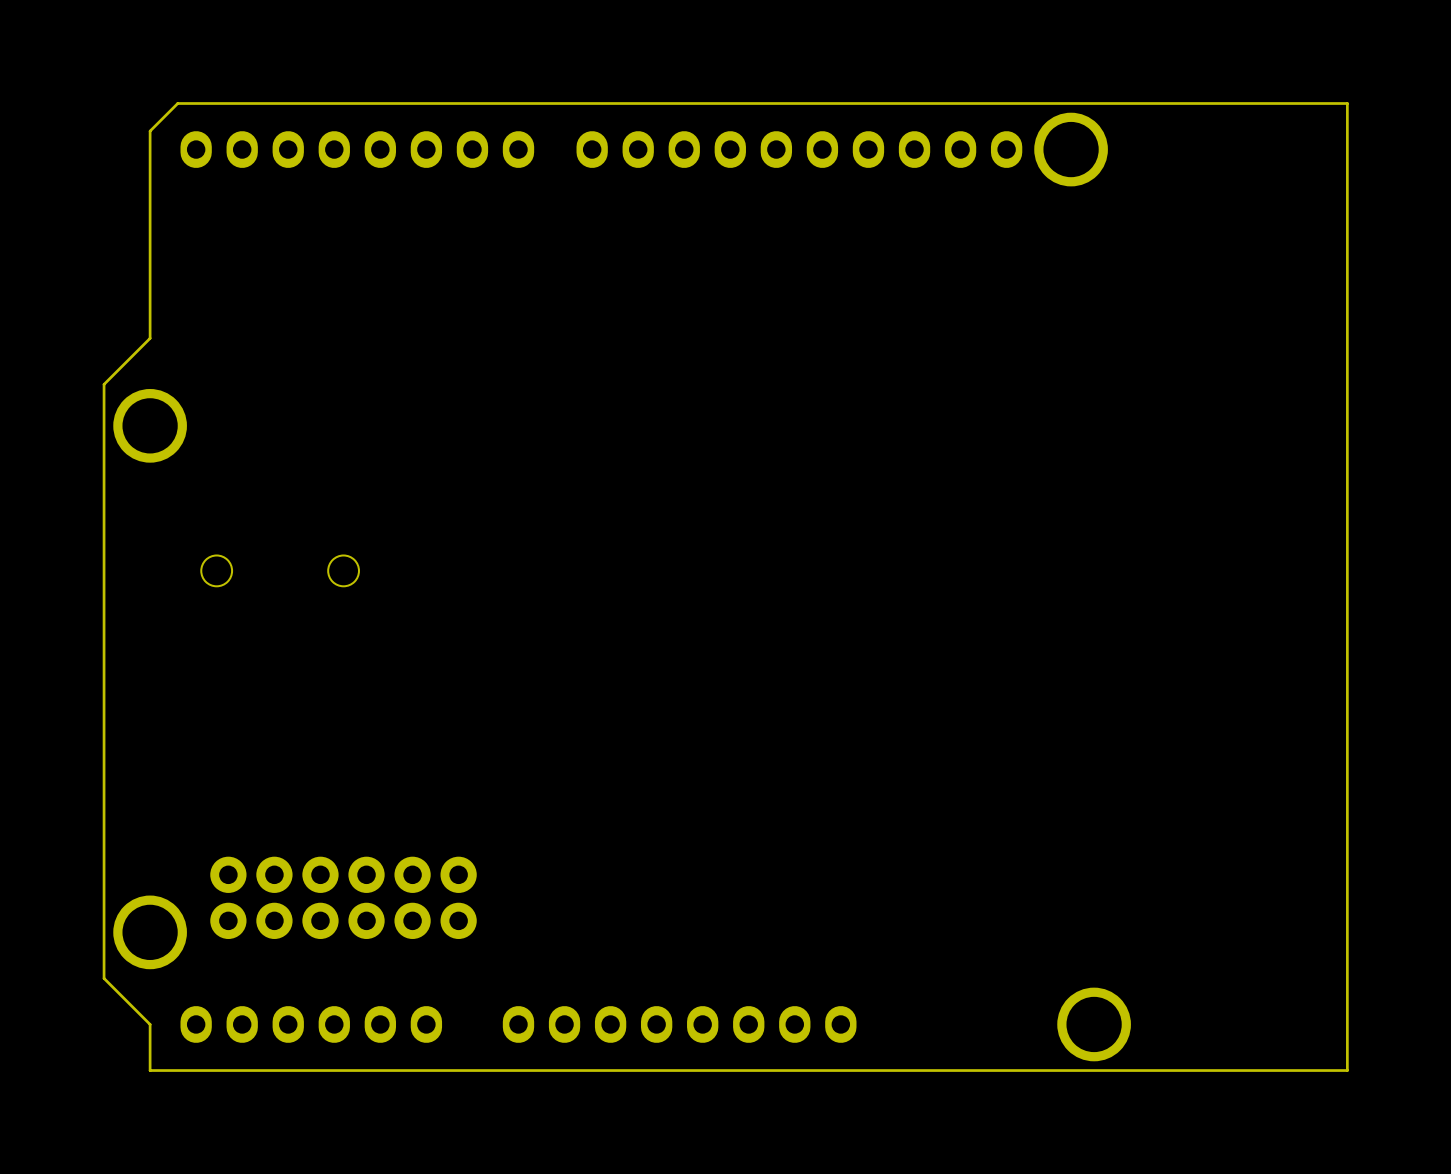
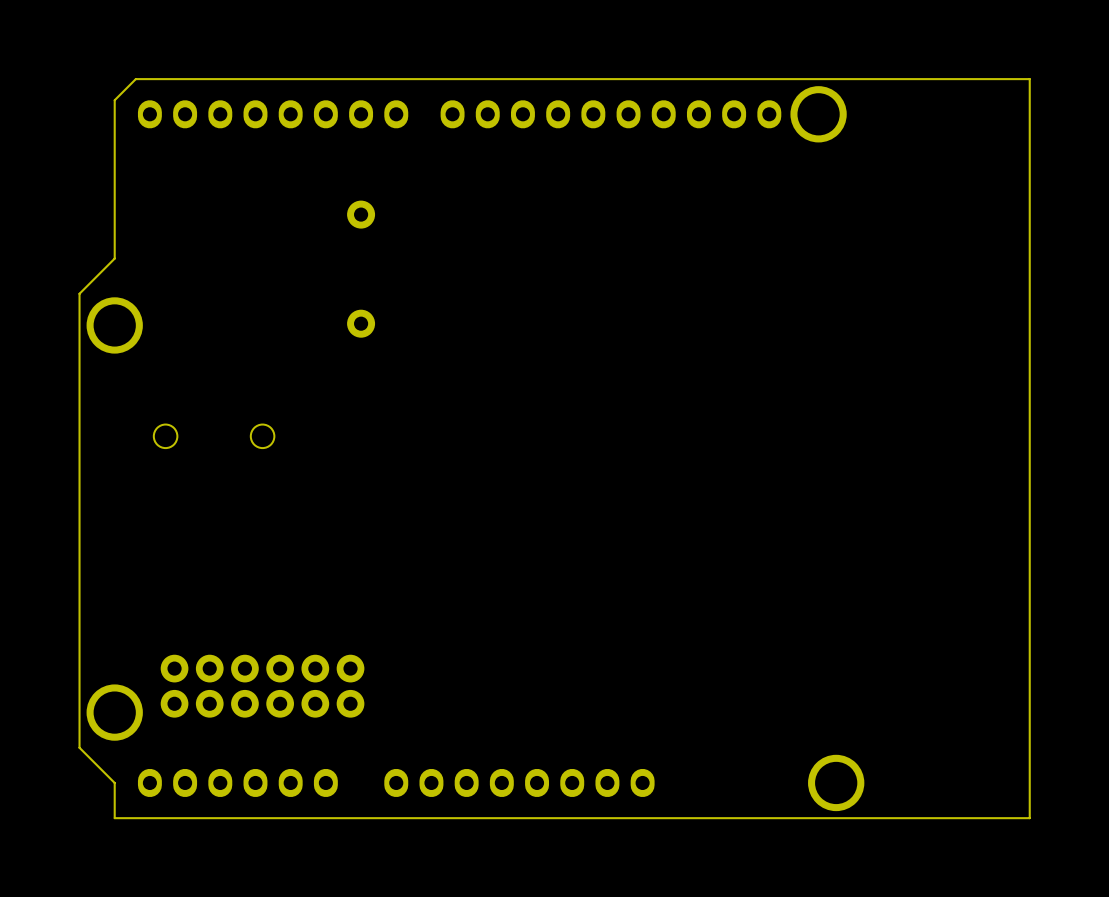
part: none -> (361, 214)
part: none -> (361, 323)

